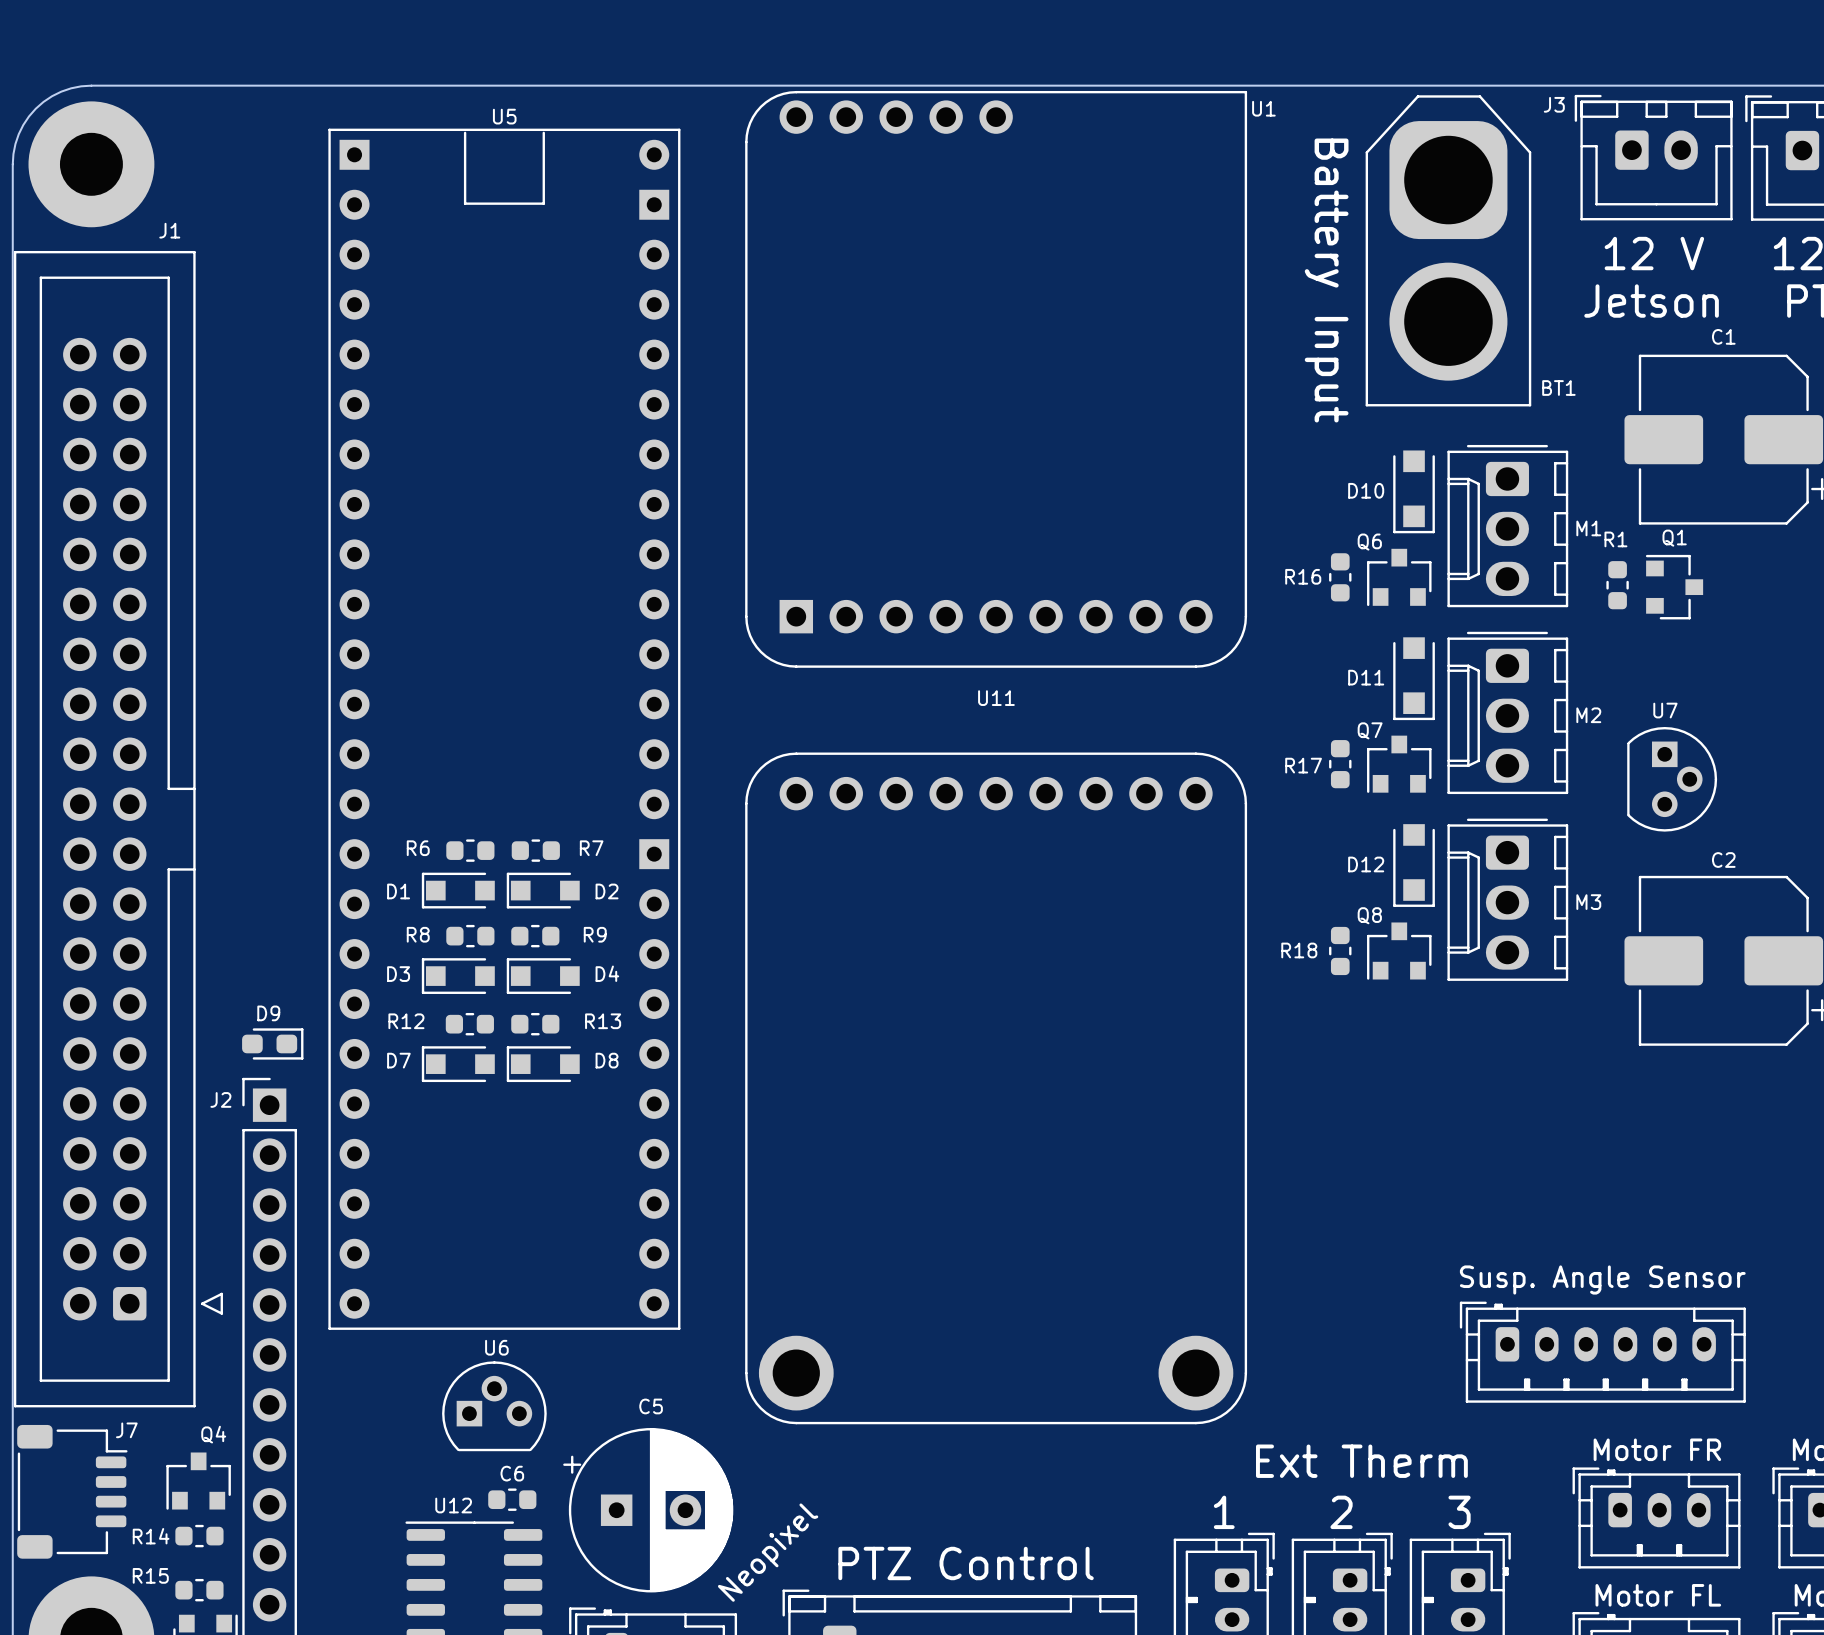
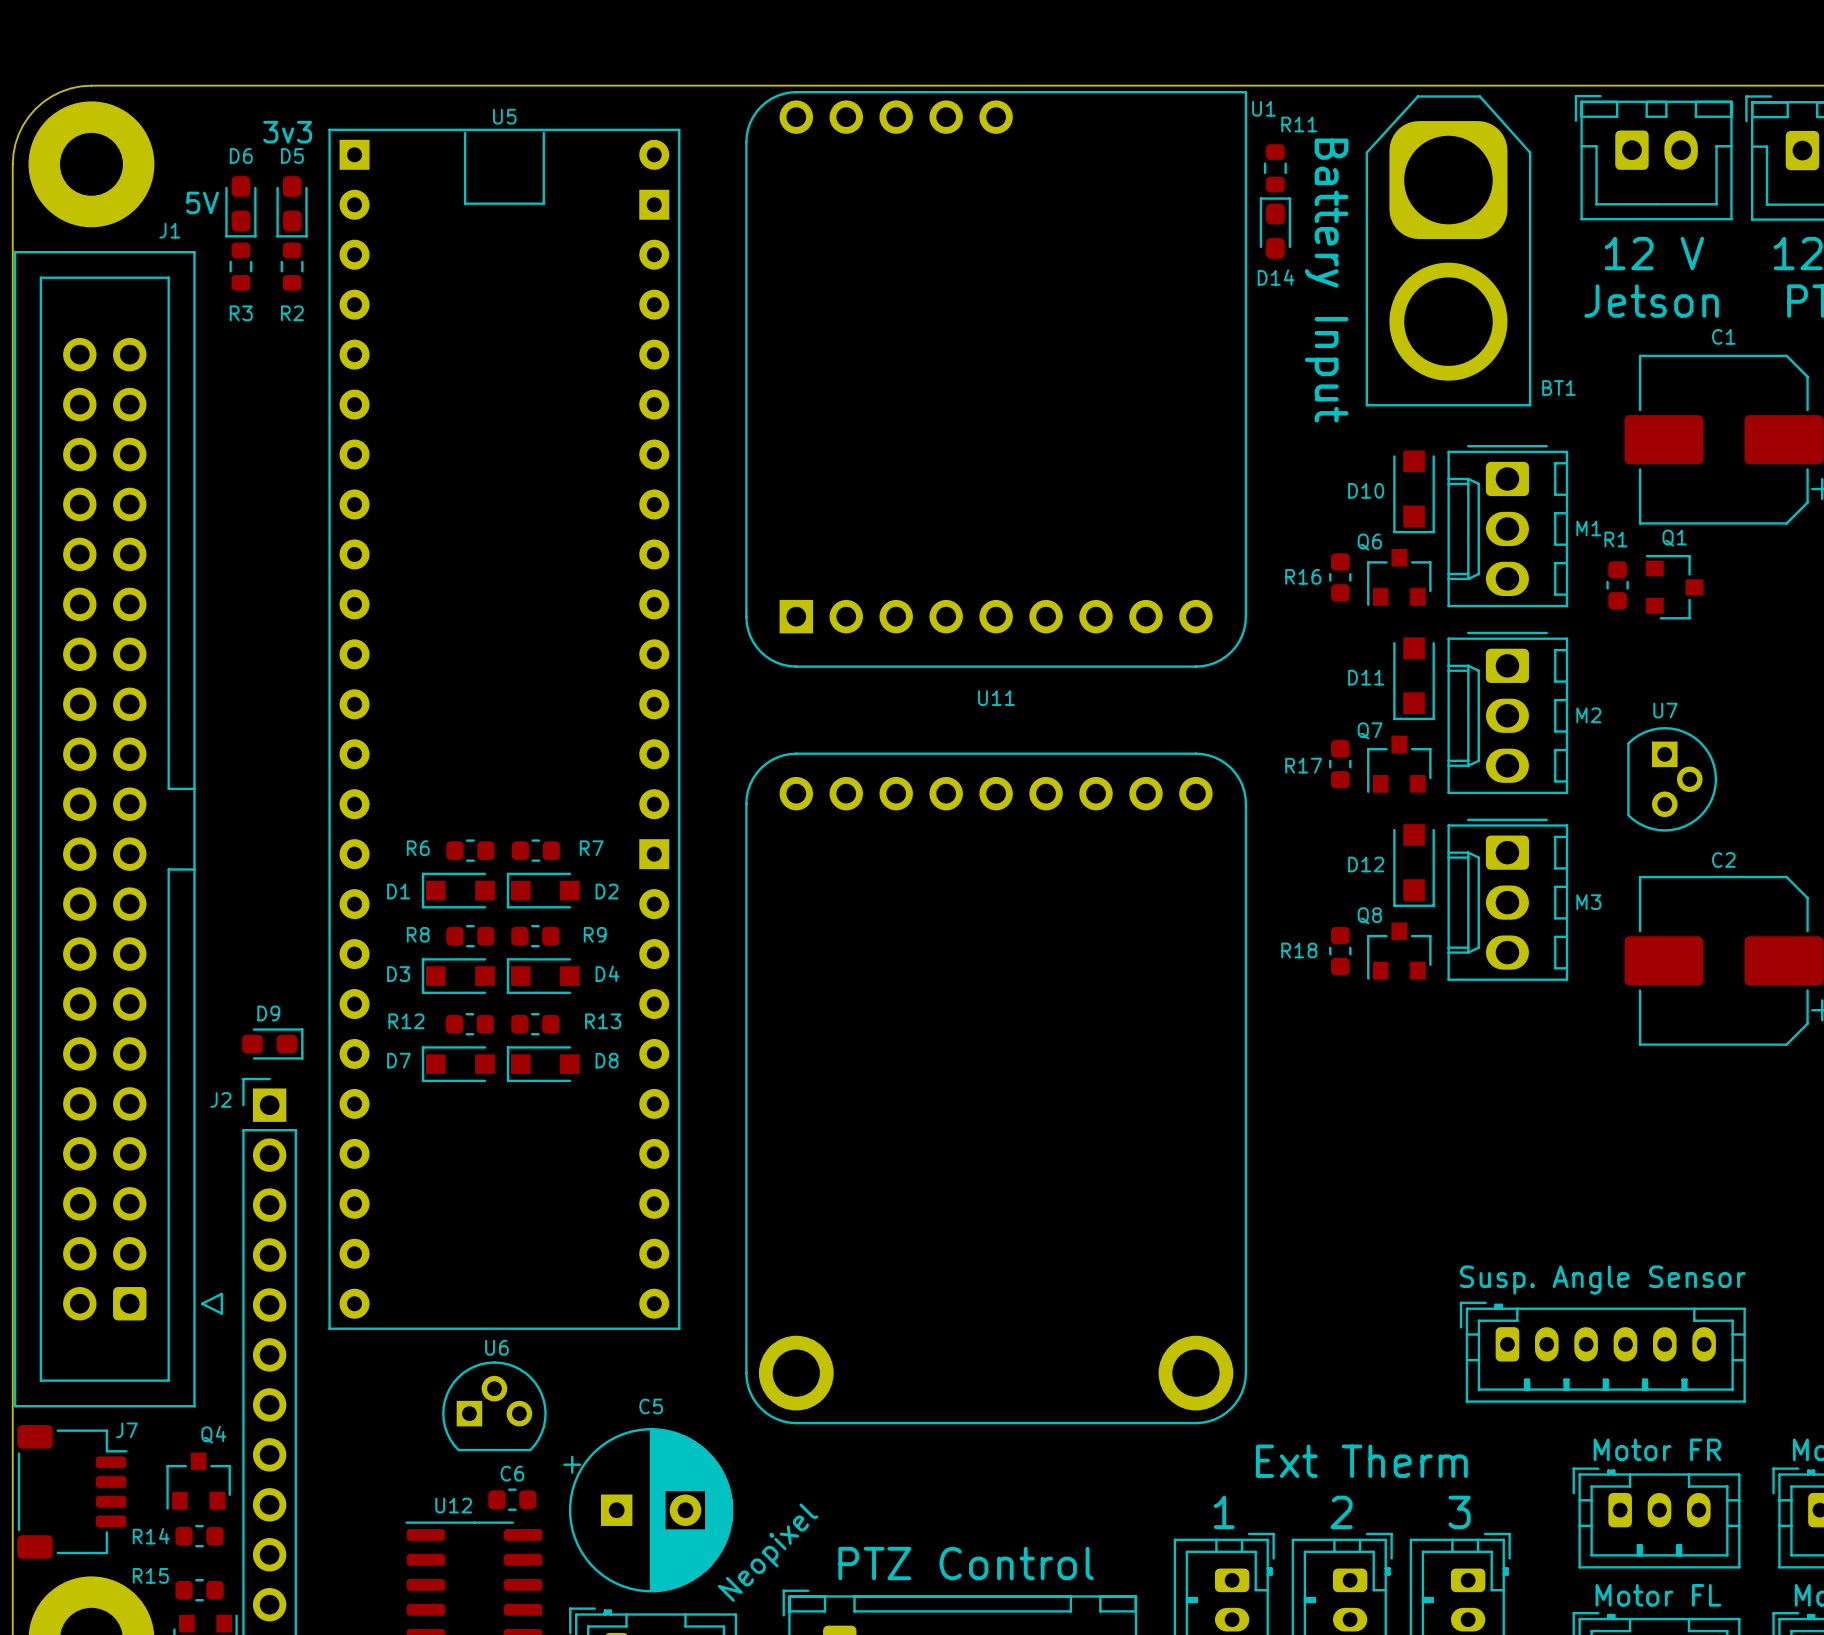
J3 name: J3 (1554, 104) -> none
text: none -> 3v3 (287, 132)
R11: none -> (1275, 168)
text: none -> 5V (202, 202)
D6: none -> (240, 206)
D5: none -> (292, 206)
D14: none -> (1275, 228)
R3: none -> (240, 266)
R2: none -> (292, 266)

